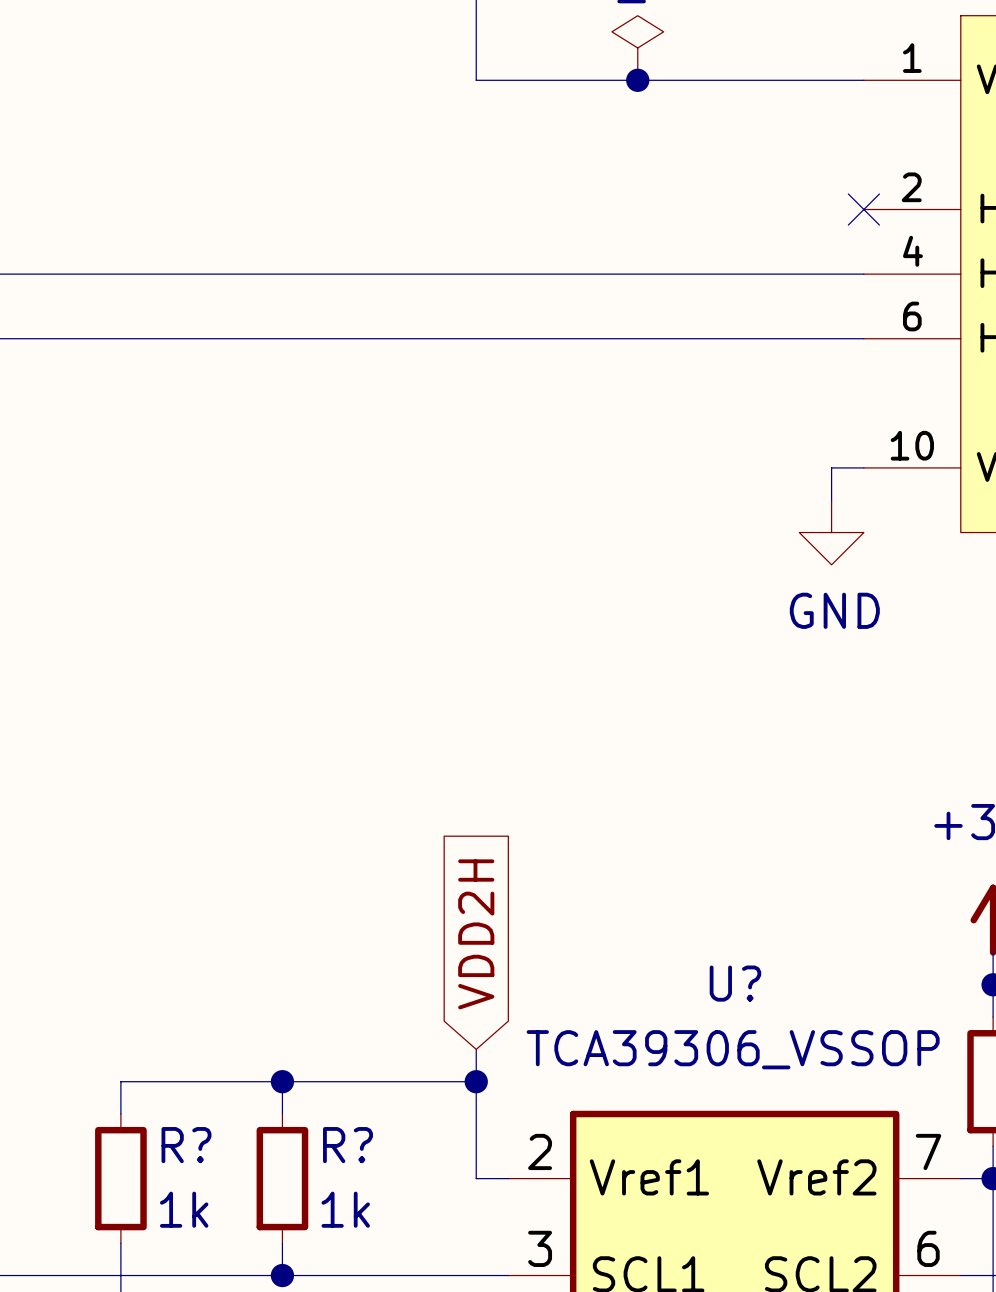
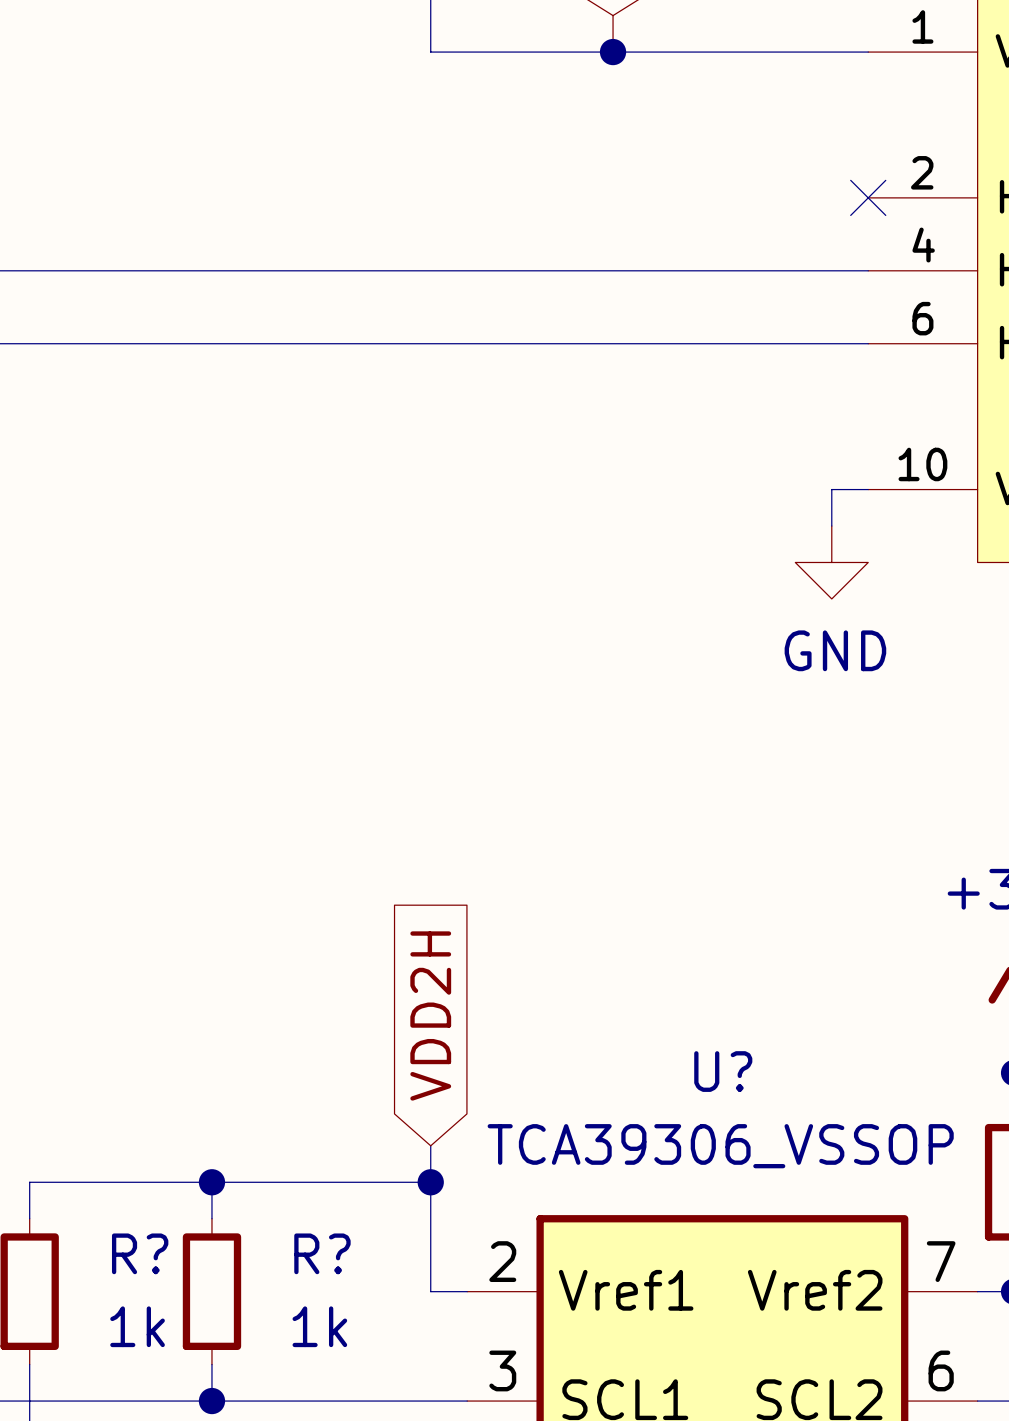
R? name position: R? (186, 1145) -> R? (140, 1253)
R? name position: R? (348, 1145) -> R? (322, 1253)
R? text position: 1k (184, 1209) -> 1k (137, 1326)
R? text position: 1k (345, 1209) -> 1k (319, 1326)

